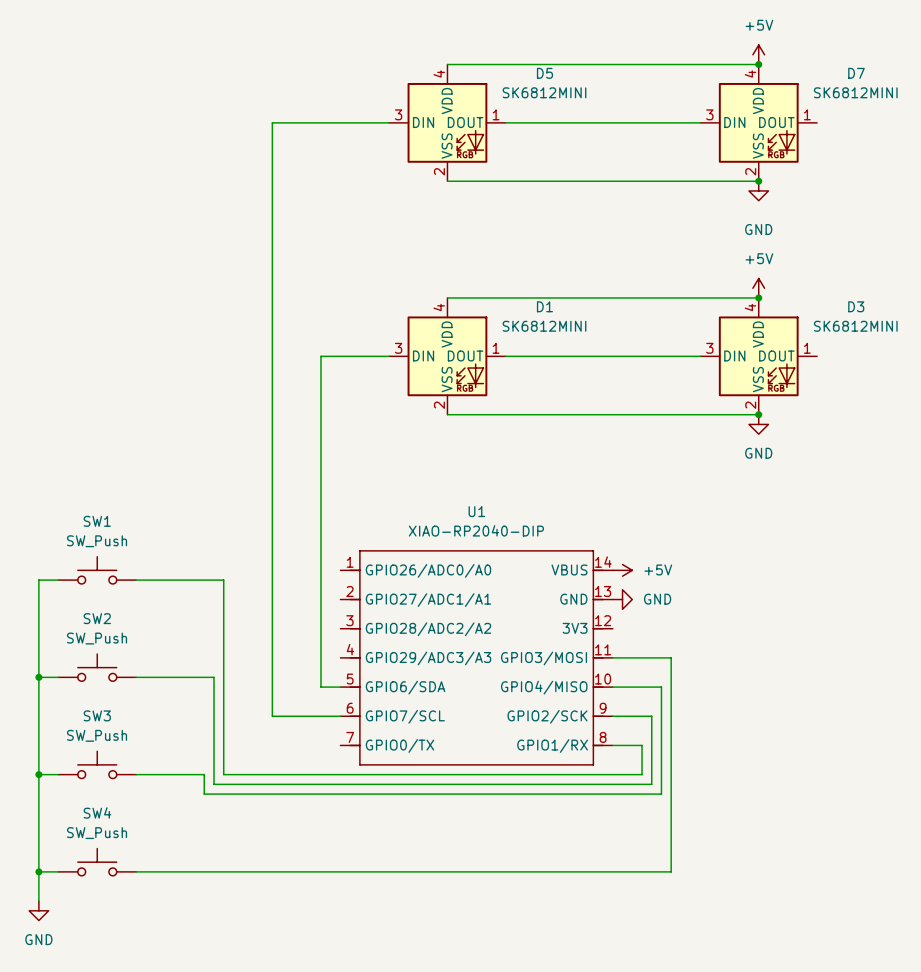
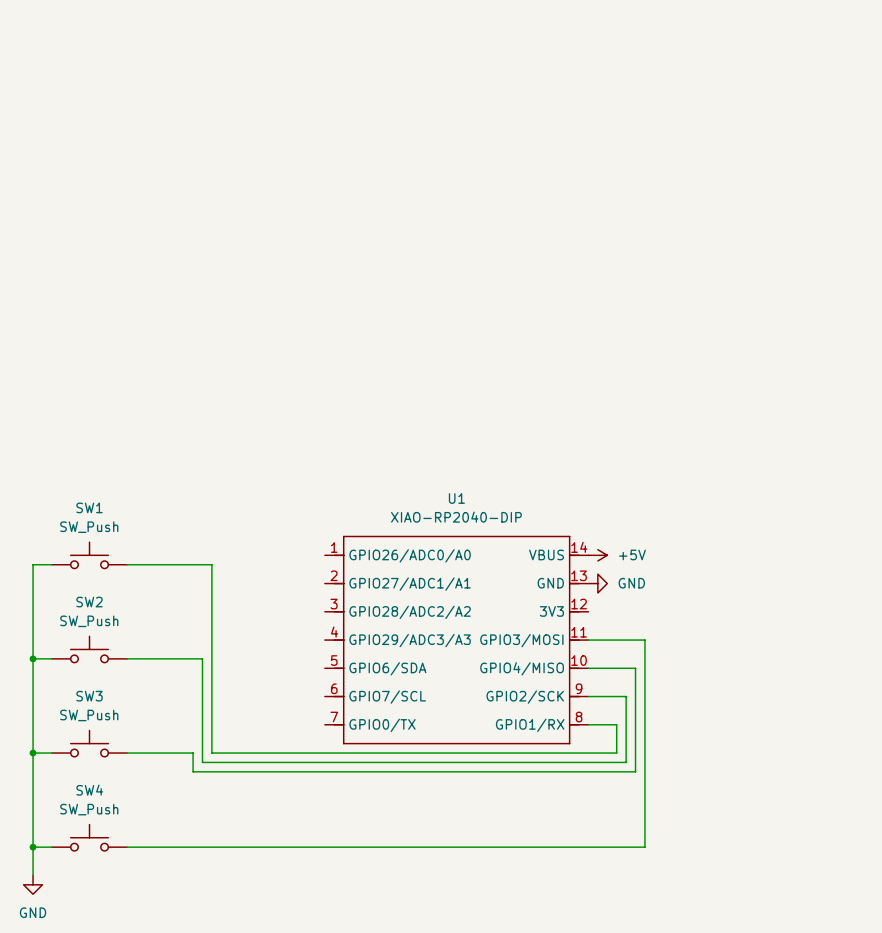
power symbol: +5V (758, 54) -> none
wire: (447, 64) (758, 64) -> none
junction: (758, 64) -> none
wire: (389, 122) (272, 122) (272, 716) (340, 716) -> none
D5: SK6812MINI (447, 122) -> none
wire: (505, 122) (700, 122) -> none
D7: SK6812MINI (758, 122) -> none
wire: (447, 181) (758, 181) -> none
junction: (758, 181) -> none
power symbol: GND (758, 190) -> none
power symbol: +5V (758, 288) -> none
wire: (447, 297) (758, 297) -> none
junction: (758, 297) -> none
wire: (389, 356) (320, 356) (320, 687) (340, 687) -> none
D1: SK6812MINI (447, 356) -> none
wire: (505, 356) (700, 356) -> none
D3: SK6812MINI (758, 356) -> none
wire: (447, 414) (758, 414) -> none
junction: (758, 414) -> none
power symbol: GND (758, 424) -> none

